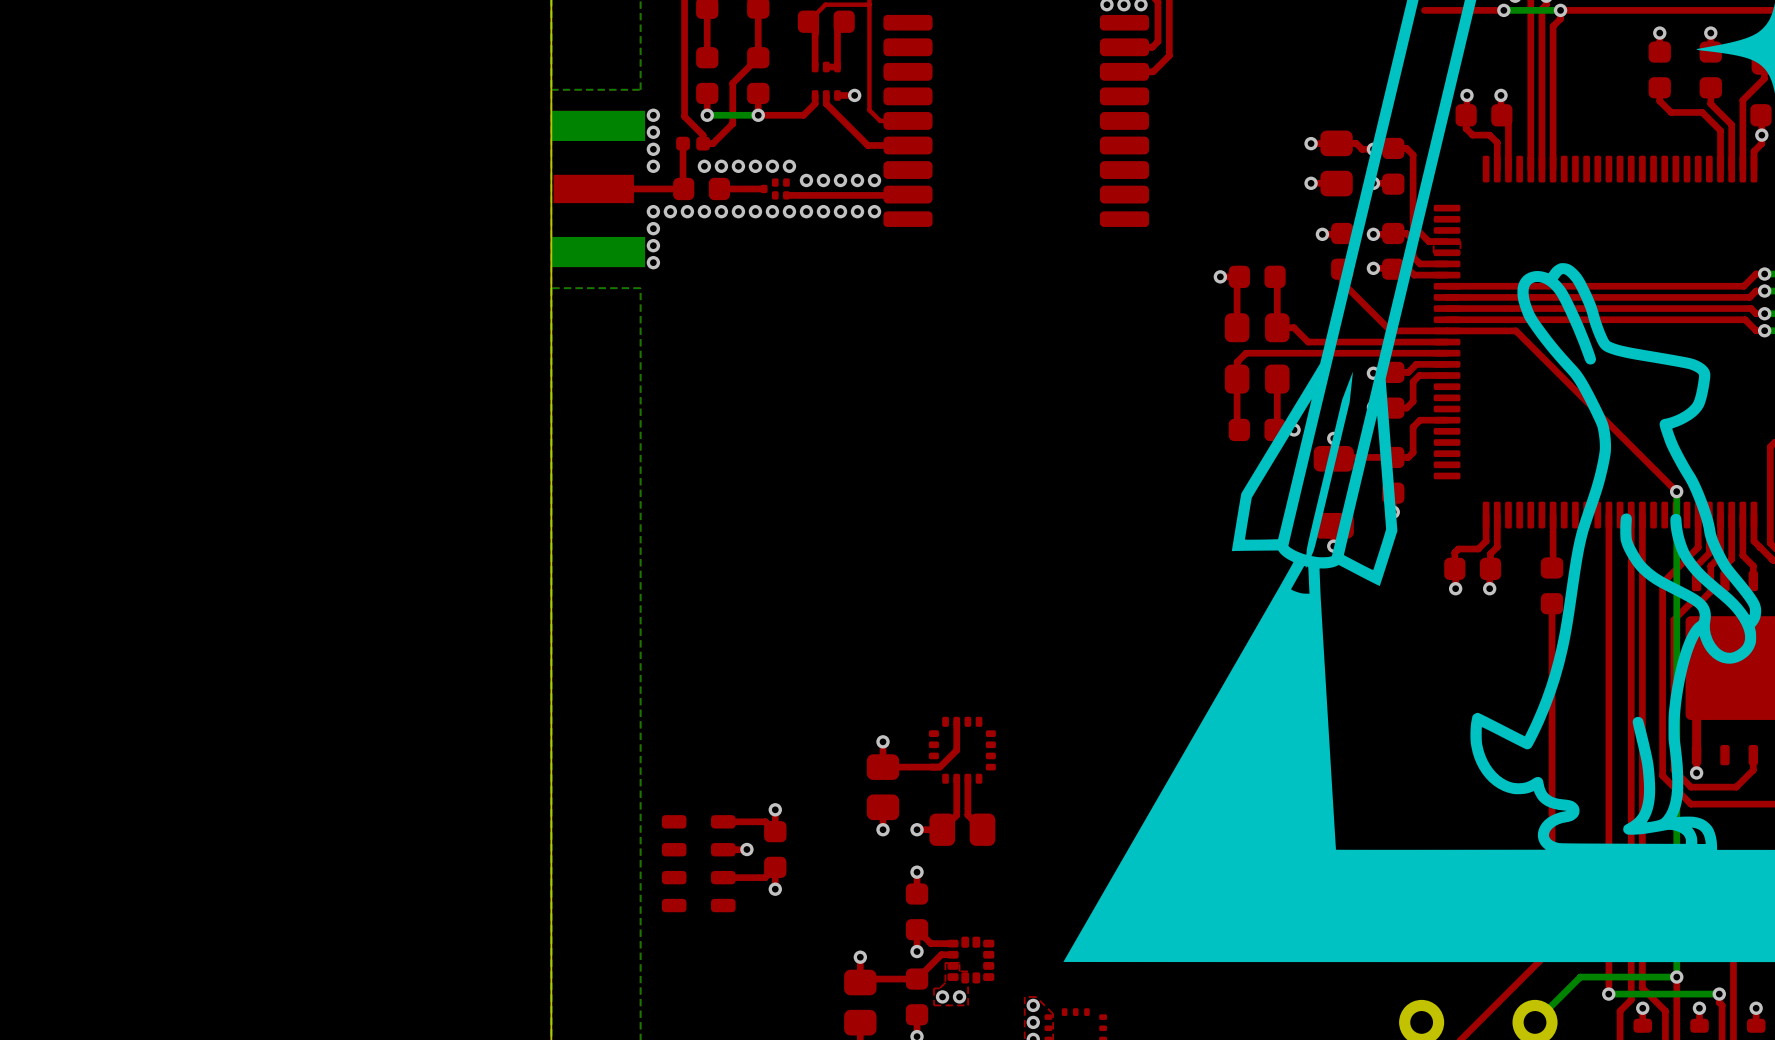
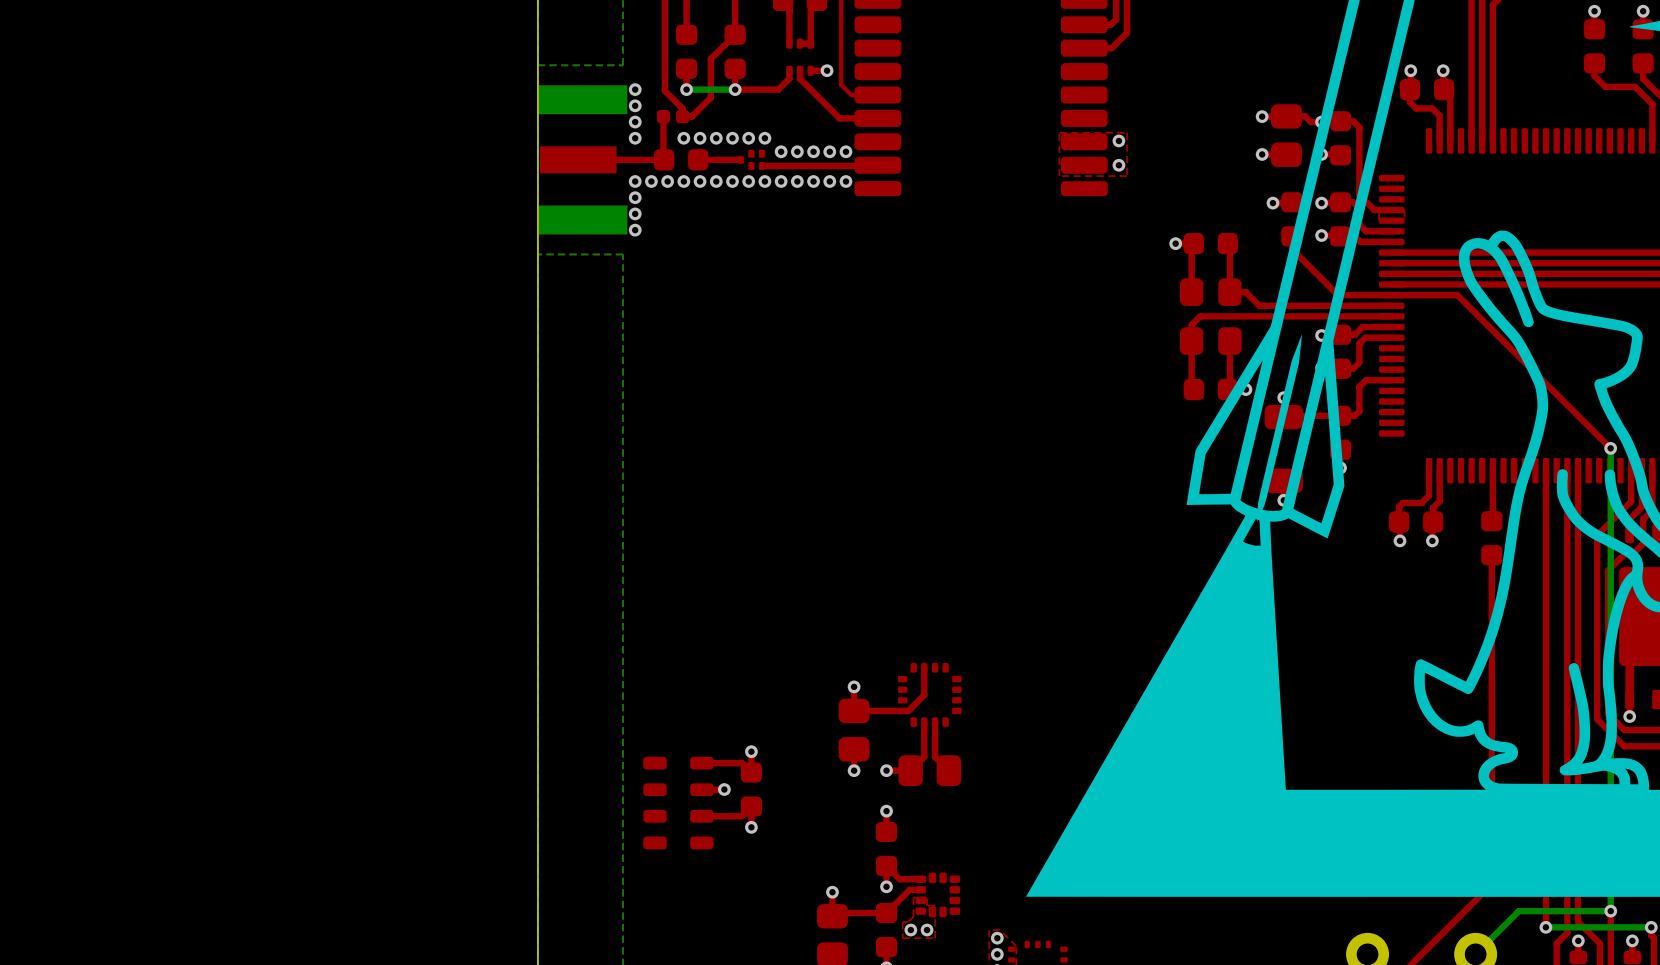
top zone outline: none -> (1127, 132) (1059, 132) (1059, 176) (1127, 176) (1127, 132)
via: none -> (1118, 140)
via: none -> (1118, 165)

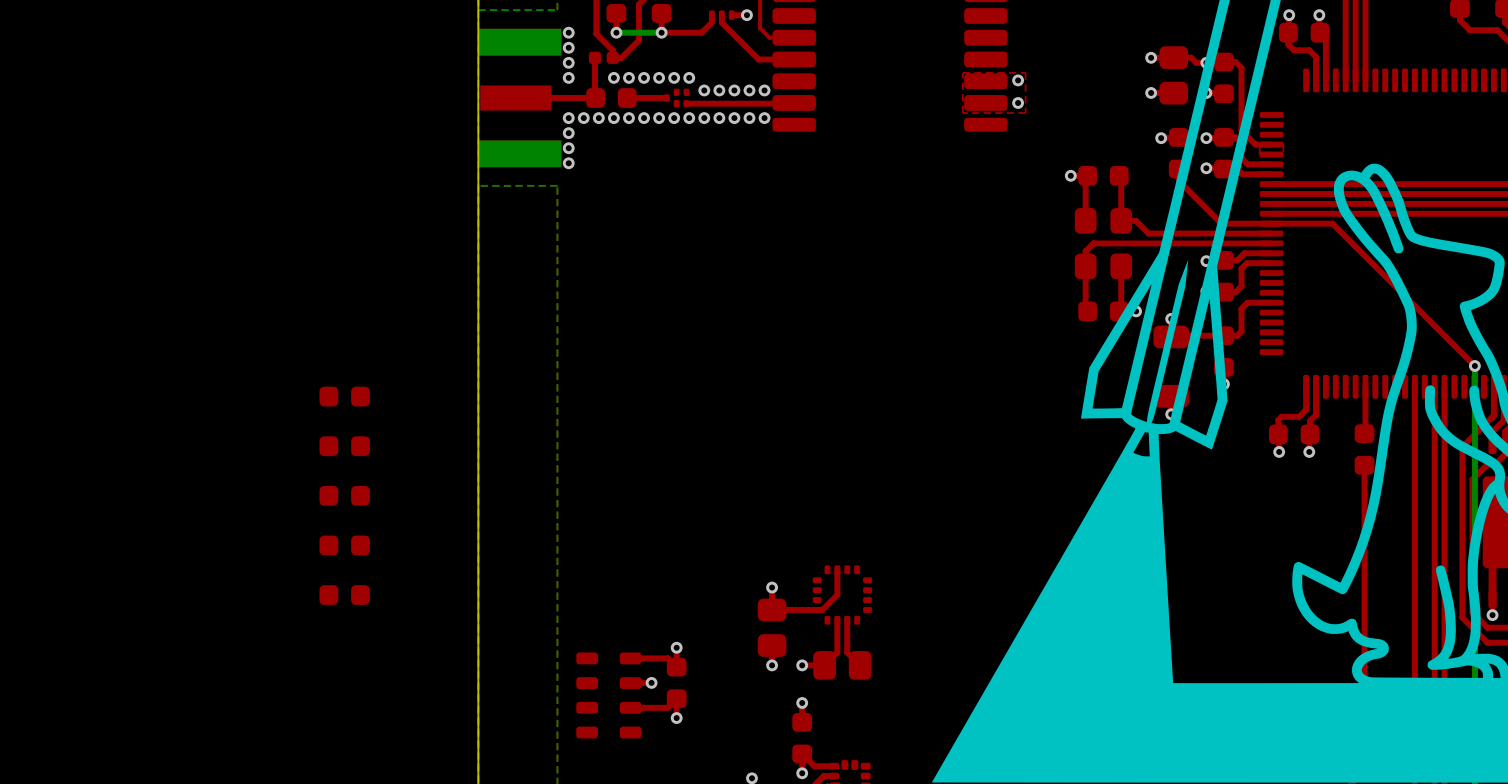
part: none -> (344, 396)
part: none -> (344, 446)
part: none -> (344, 495)
part: none -> (344, 545)
part: none -> (344, 595)

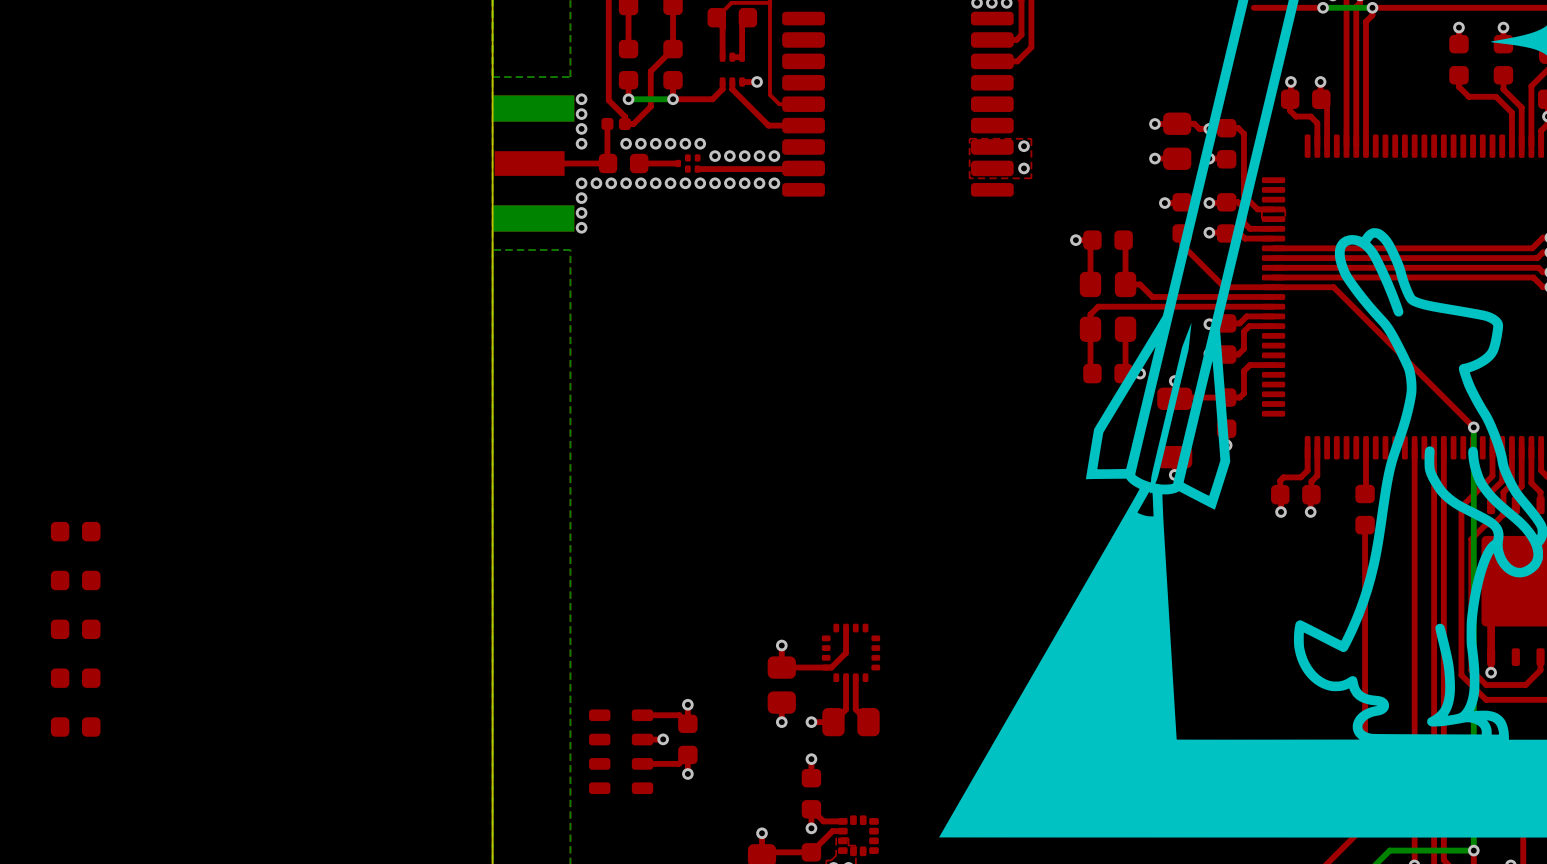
part: (344, 396) -> none
part: (344, 446) -> none
part: none -> (75, 531)
part: (344, 495) -> none
part: none -> (75, 580)
part: (344, 545) -> none
part: none -> (75, 629)
part: (344, 595) -> none
part: none -> (75, 678)
part: none -> (75, 727)

